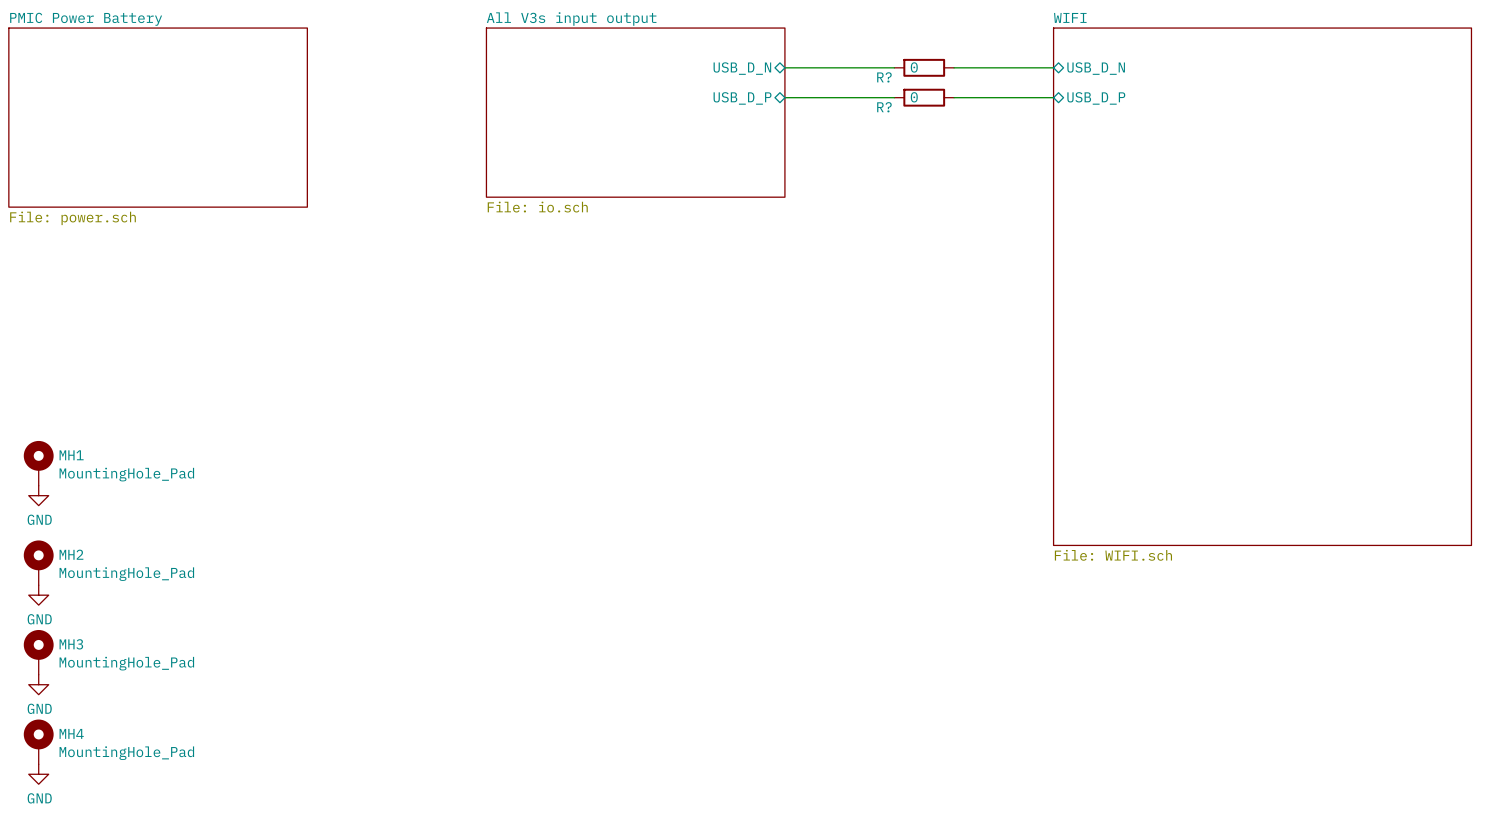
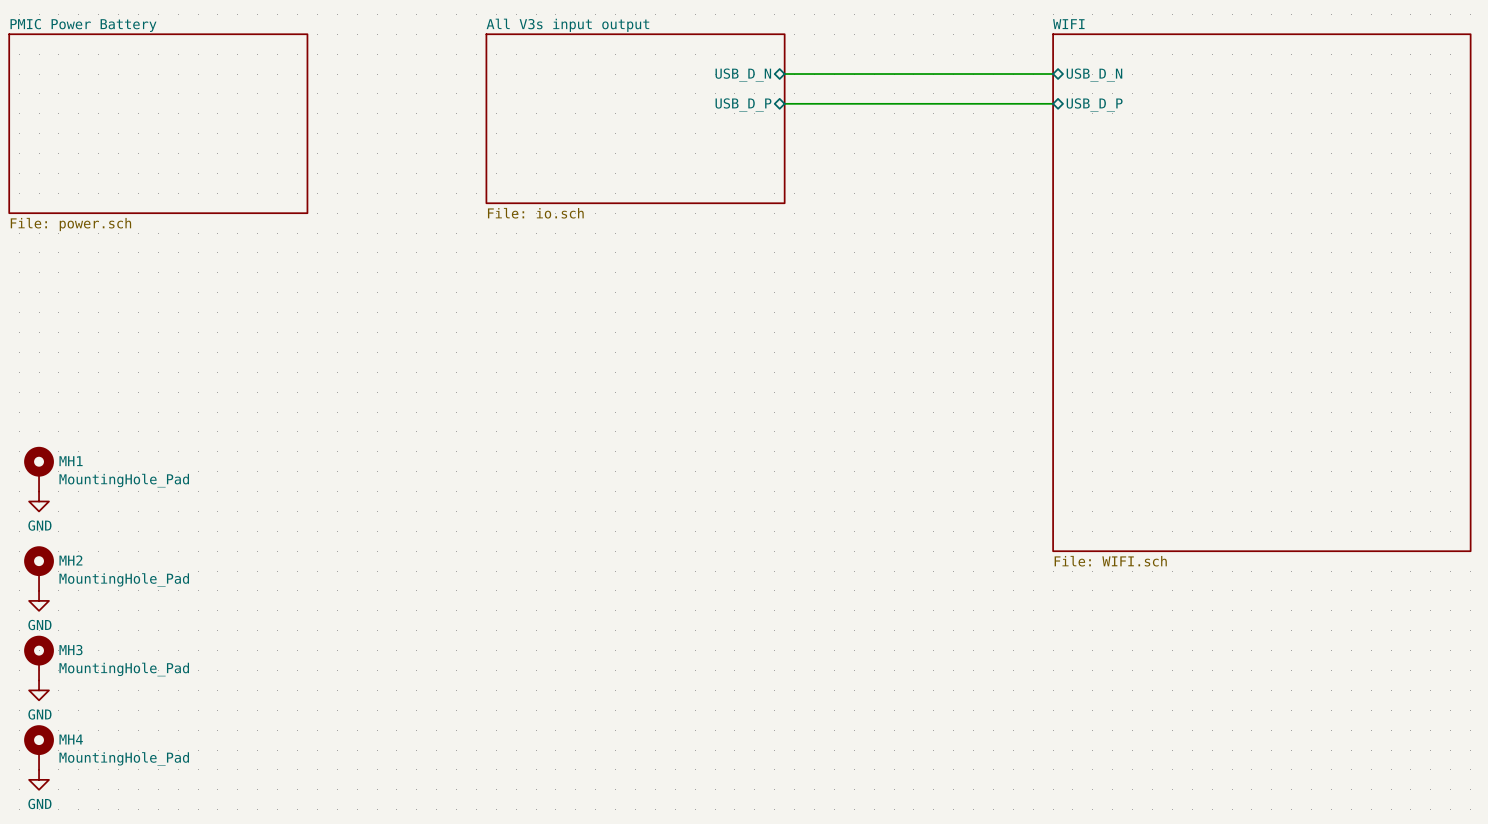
wire: none -> (894, 74) (953, 74)
R?: 0 (924, 67) -> none
wire: none -> (894, 103) (953, 103)
R?: 0 (924, 97) -> none

